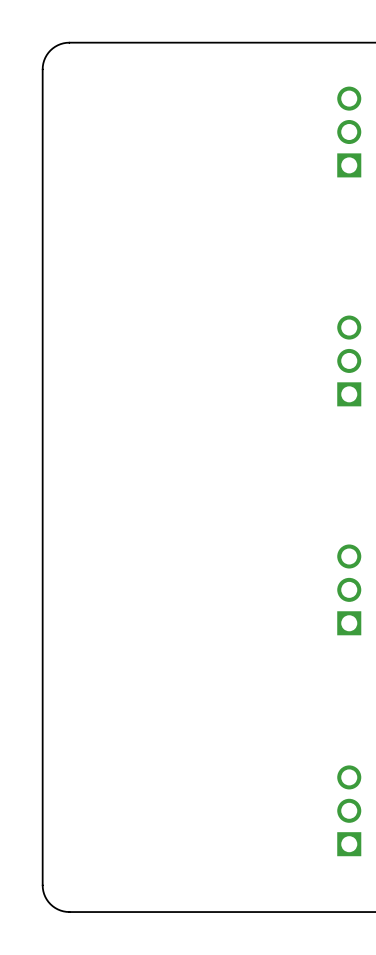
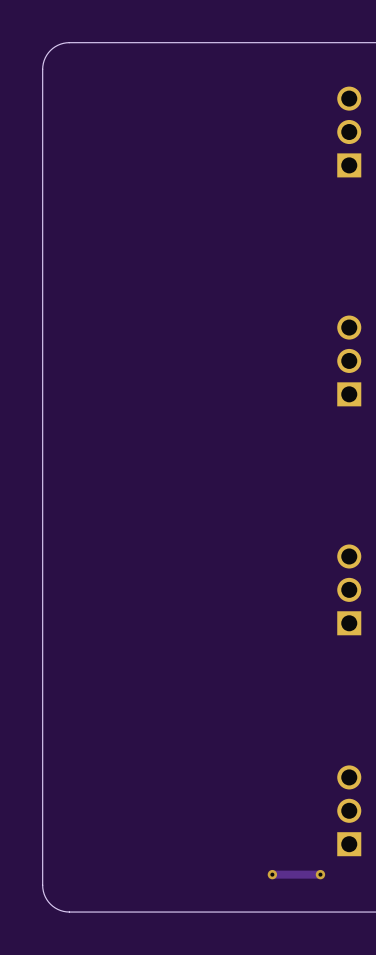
via: none -> (272, 874)
track: none -> (320, 874) (272, 874)
via: none -> (320, 874)

